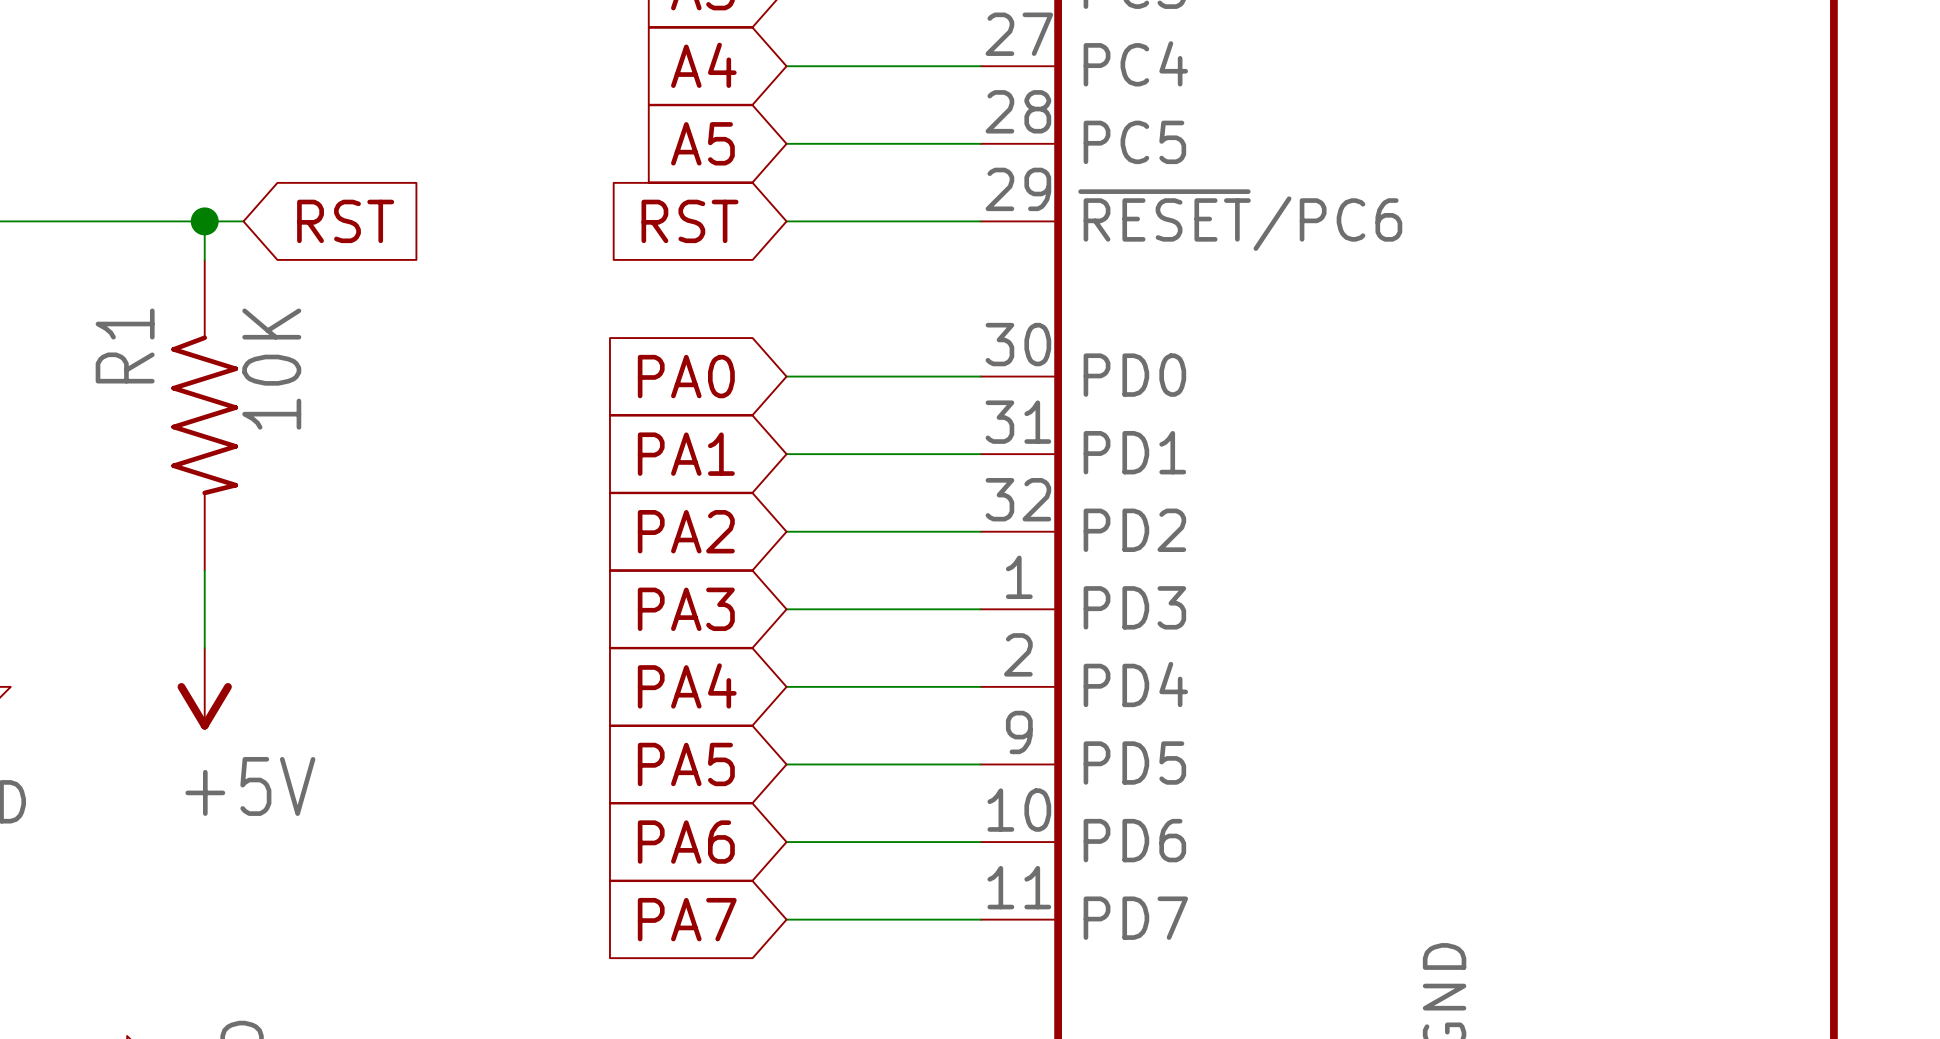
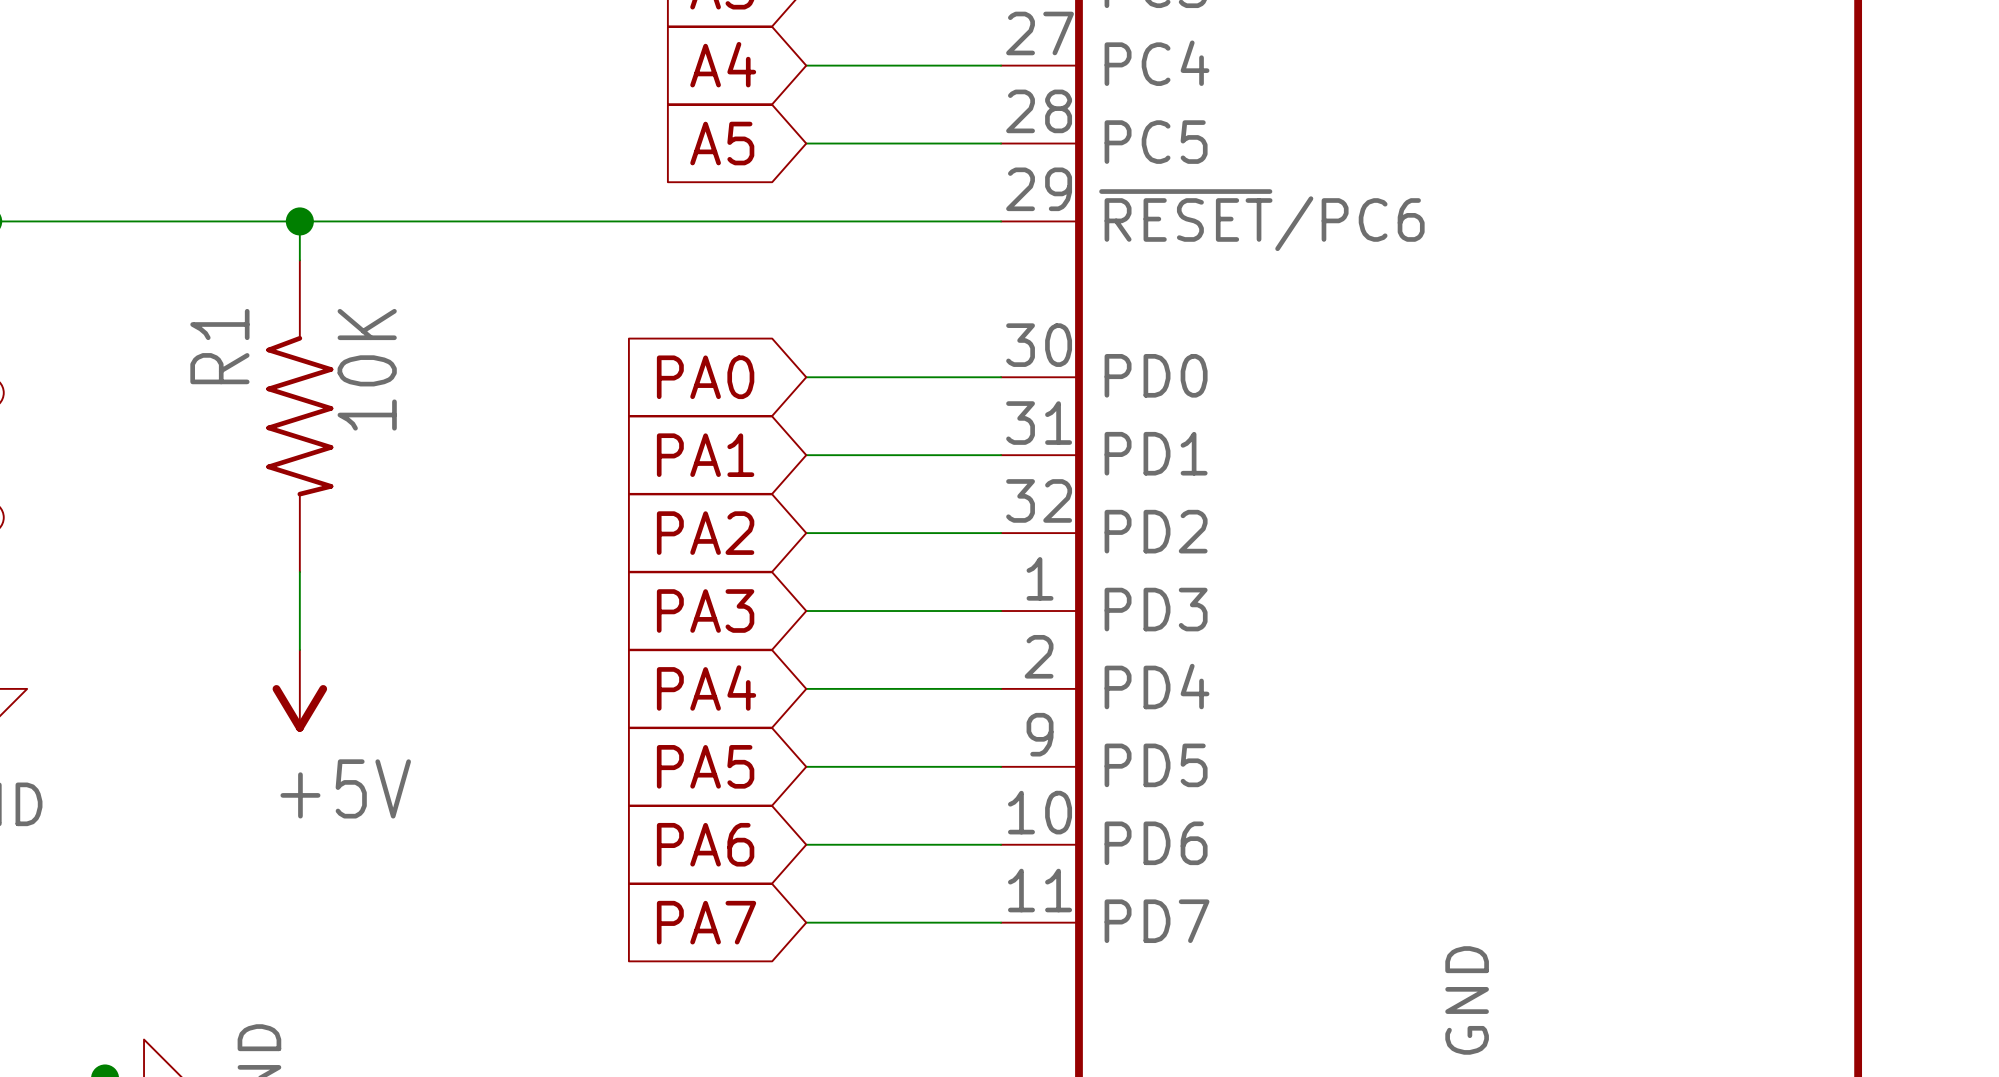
wire: (204, 221) (204, 260) -> (299, 221) (299, 260)
junction position: (204, 221) -> (299, 221)
wire: none -> (260, 221) (806, 221)
global label: RST (345, 221) -> none
global label: RST (690, 221) -> none
R1 position: (204, 415) -> (299, 416)
wire: (204, 570) (204, 648) -> (299, 572) (299, 649)
power symbol position: +5V (204, 688) -> +5V (299, 690)

